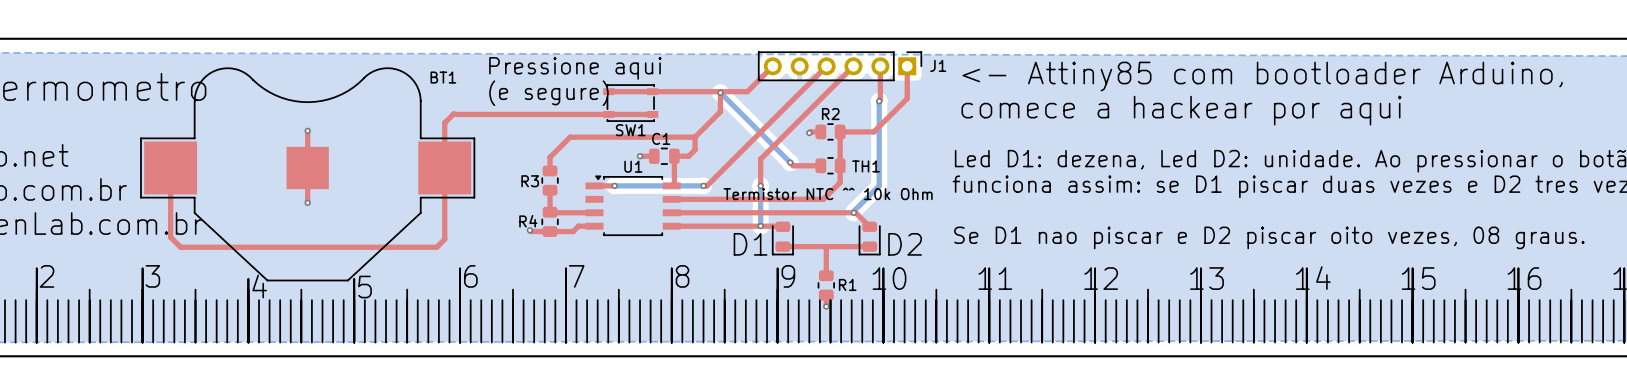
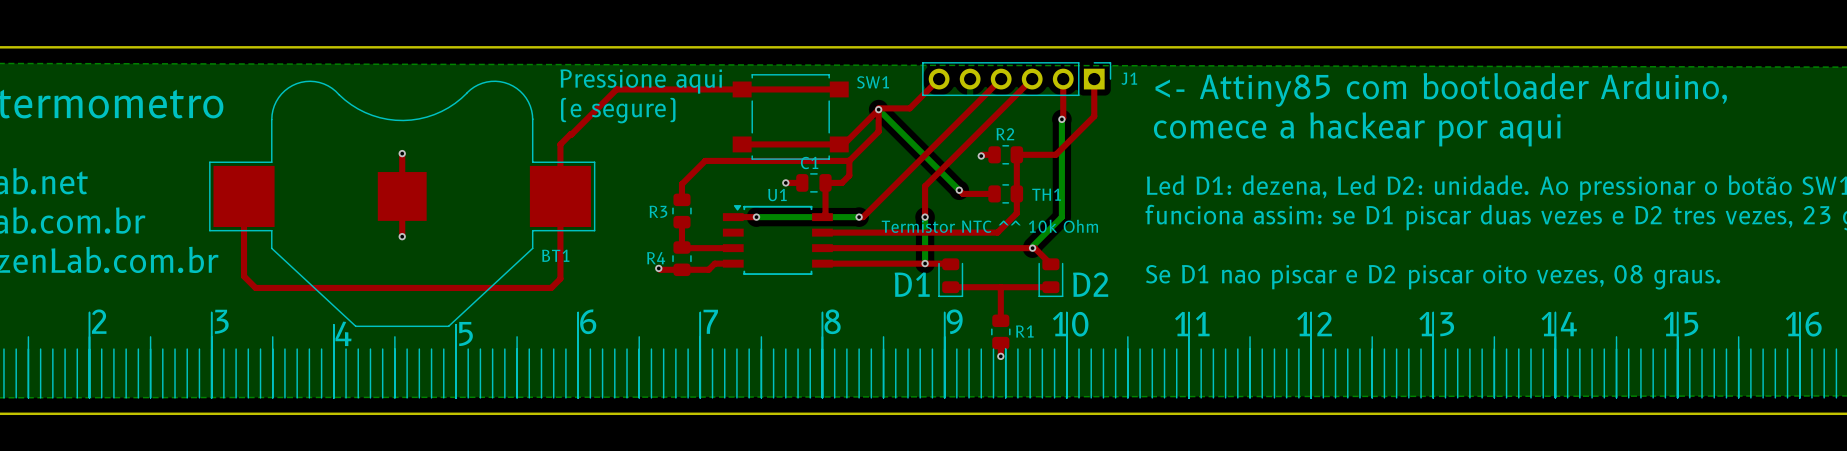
text position: Pressione aqui (575, 68) -> Pressione aqui (641, 81)
BT1 name position: BT1 (443, 77) -> BT1 (555, 255)
SW1 footprint: [603, 84, 659, 122] -> [732, 74, 849, 160]
top track: (608, 91) (720, 91) -> none
top track: none -> (878, 109) (843, 144) (742, 144)
text position: (e segure) (548, 93) -> (e segure) (618, 110)
top track: (454, 114) (652, 114) -> (571, 134) (616, 89) (839, 89)
SW1 name position: SW1 (630, 130) -> SW1 (873, 82)

